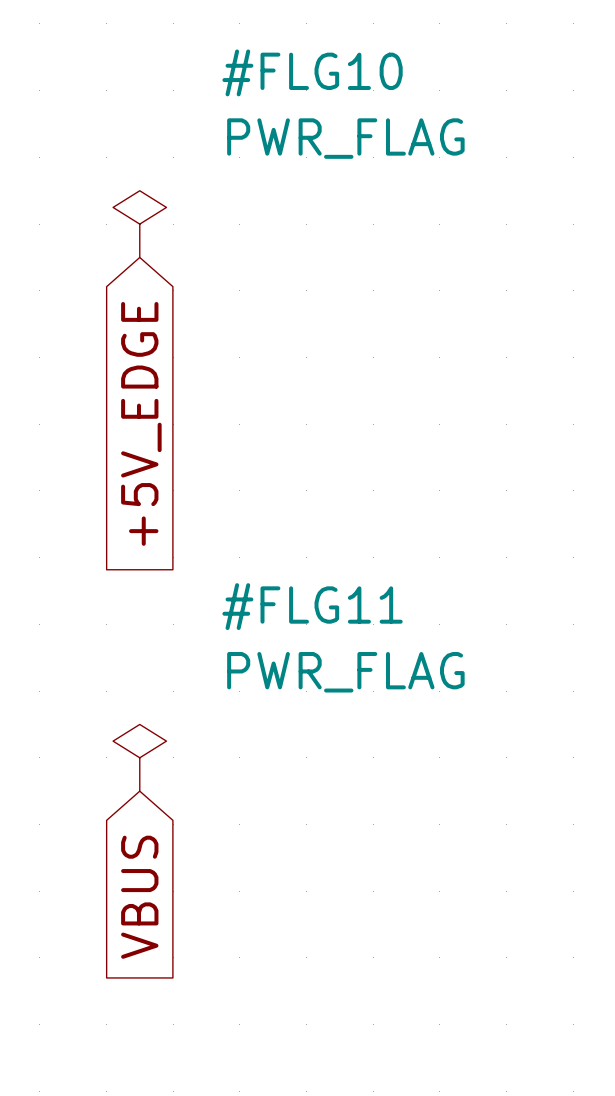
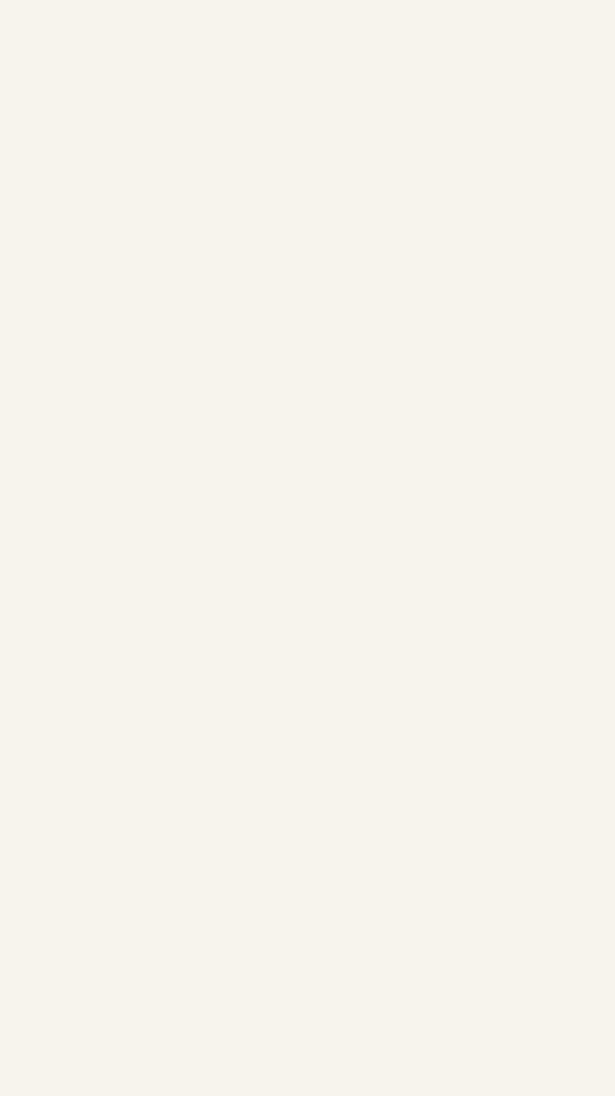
#FLG10: PWR_FLAG (139, 224) -> none
global label: +5V_EDGE (141, 423) -> none
#FLG11: PWR_FLAG (139, 757) -> none
global label: VBUS (139, 897) -> none

